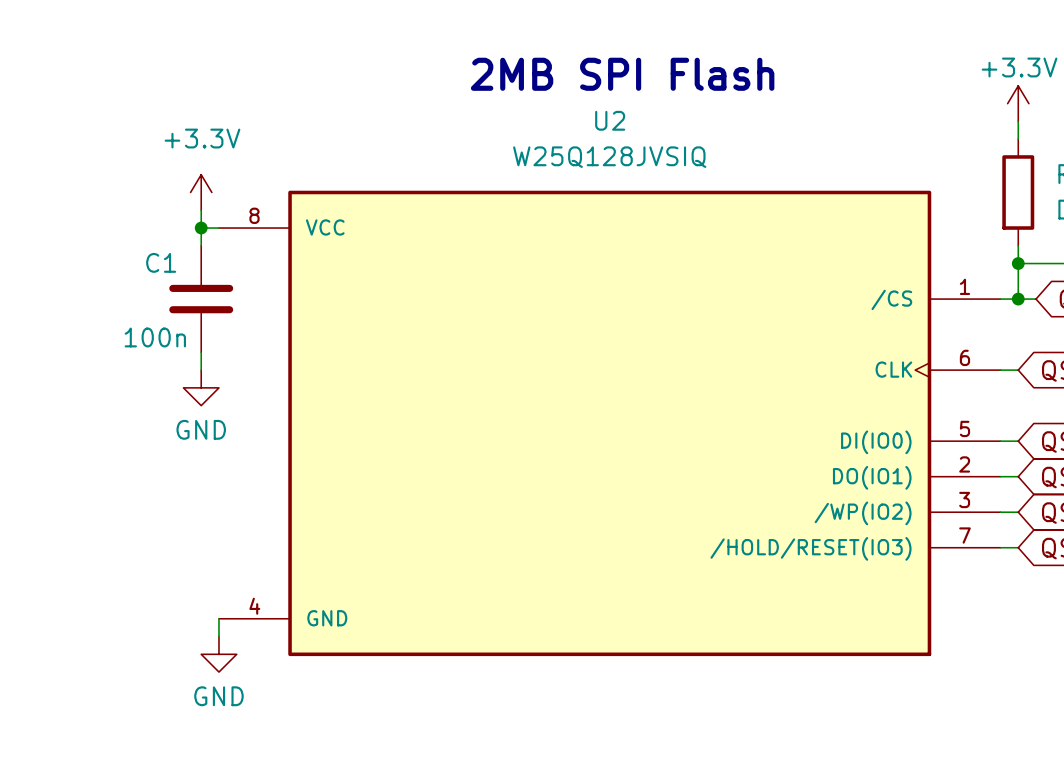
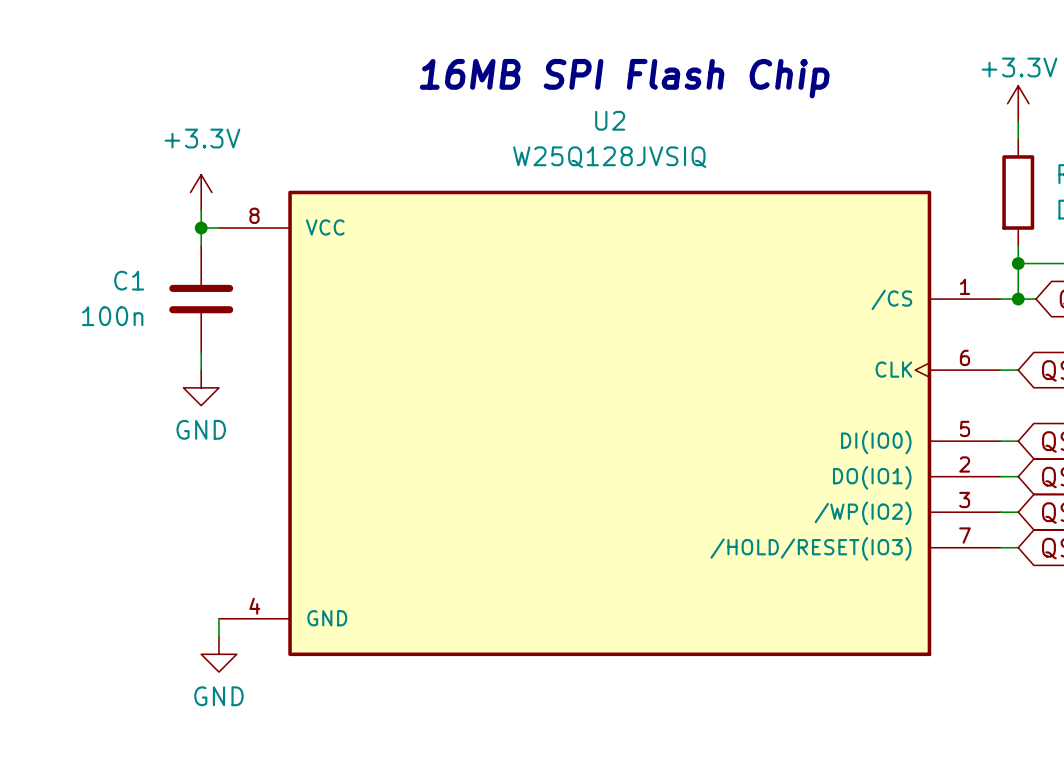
text: 2MB SPI Flash (622, 74) -> 16MB SPI Flash Chip (624, 78)
C1 name position: C1 (161, 262) -> C1 (129, 280)
C1 value position: 100n (155, 337) -> 100n (112, 316)

